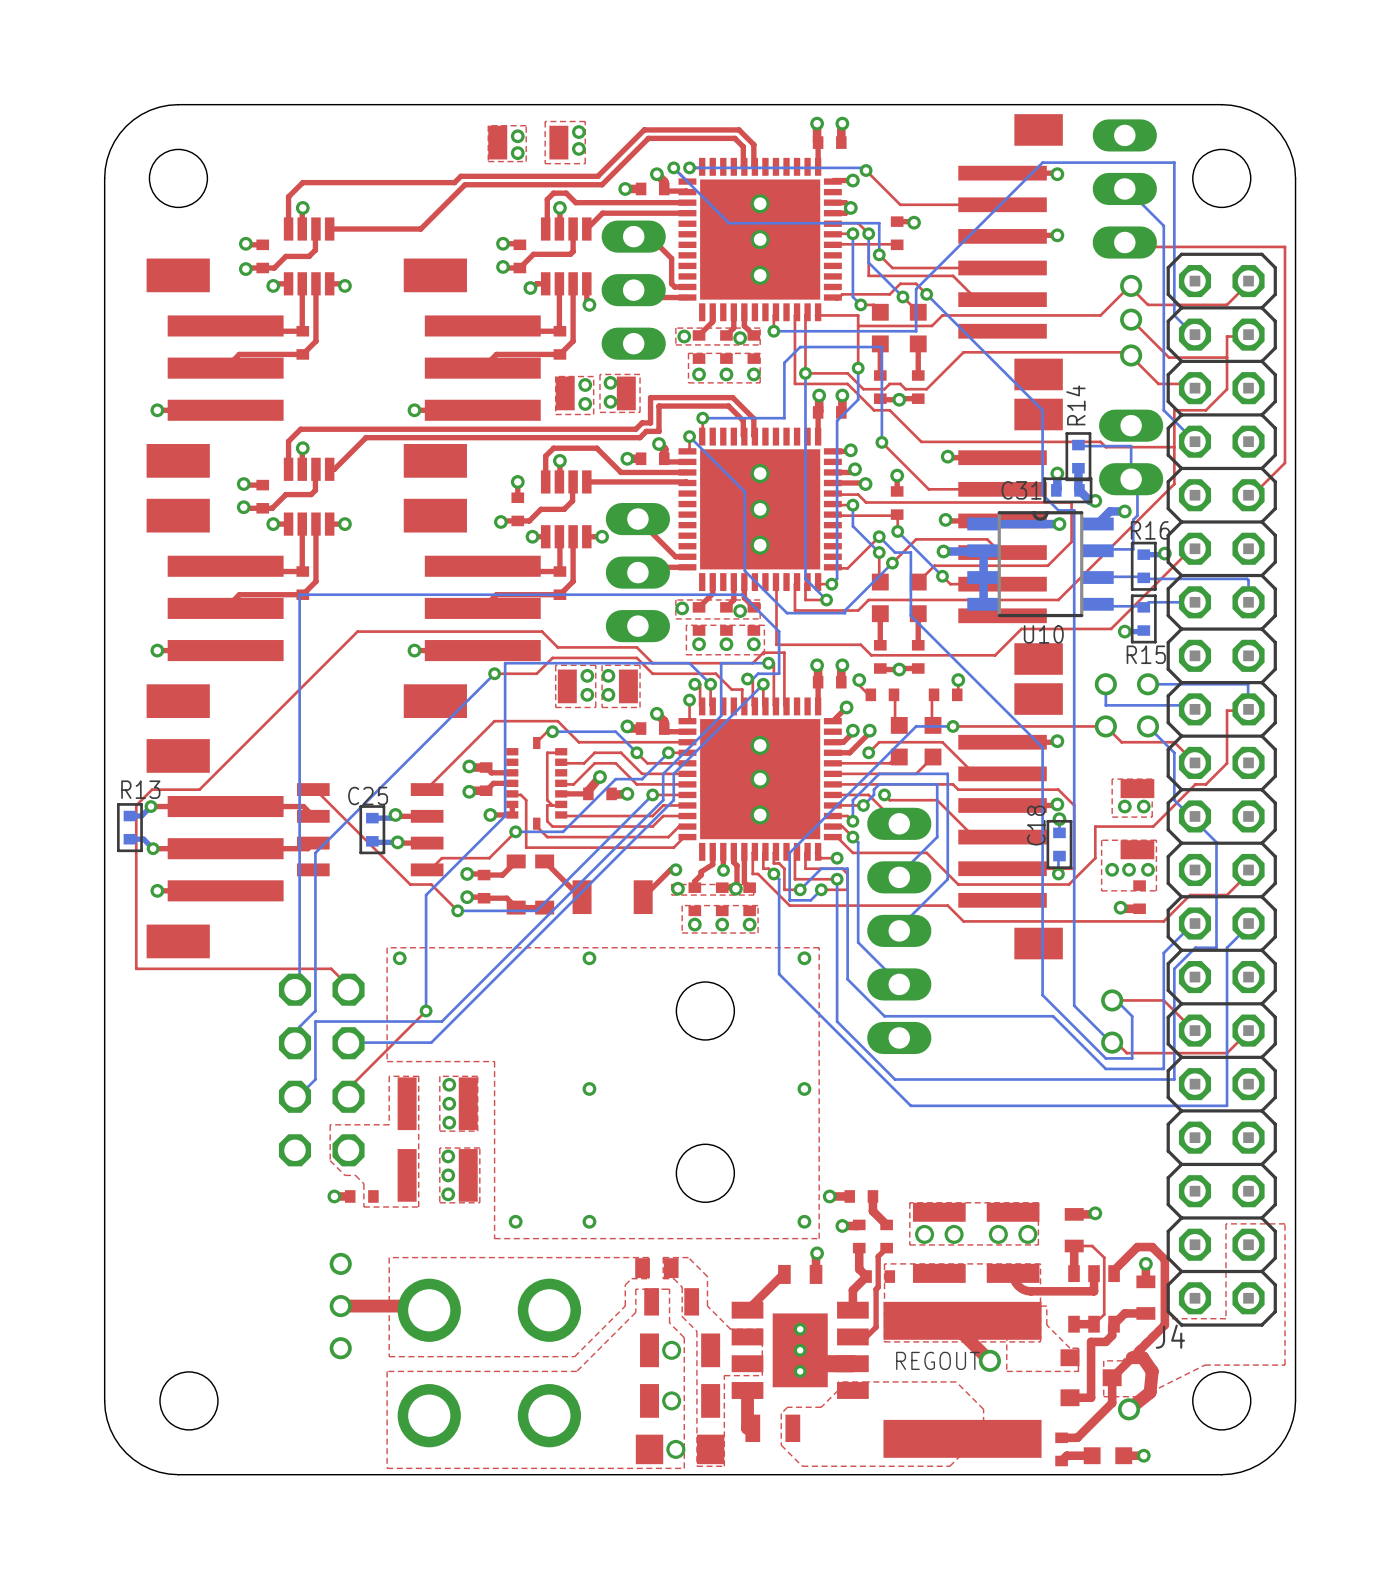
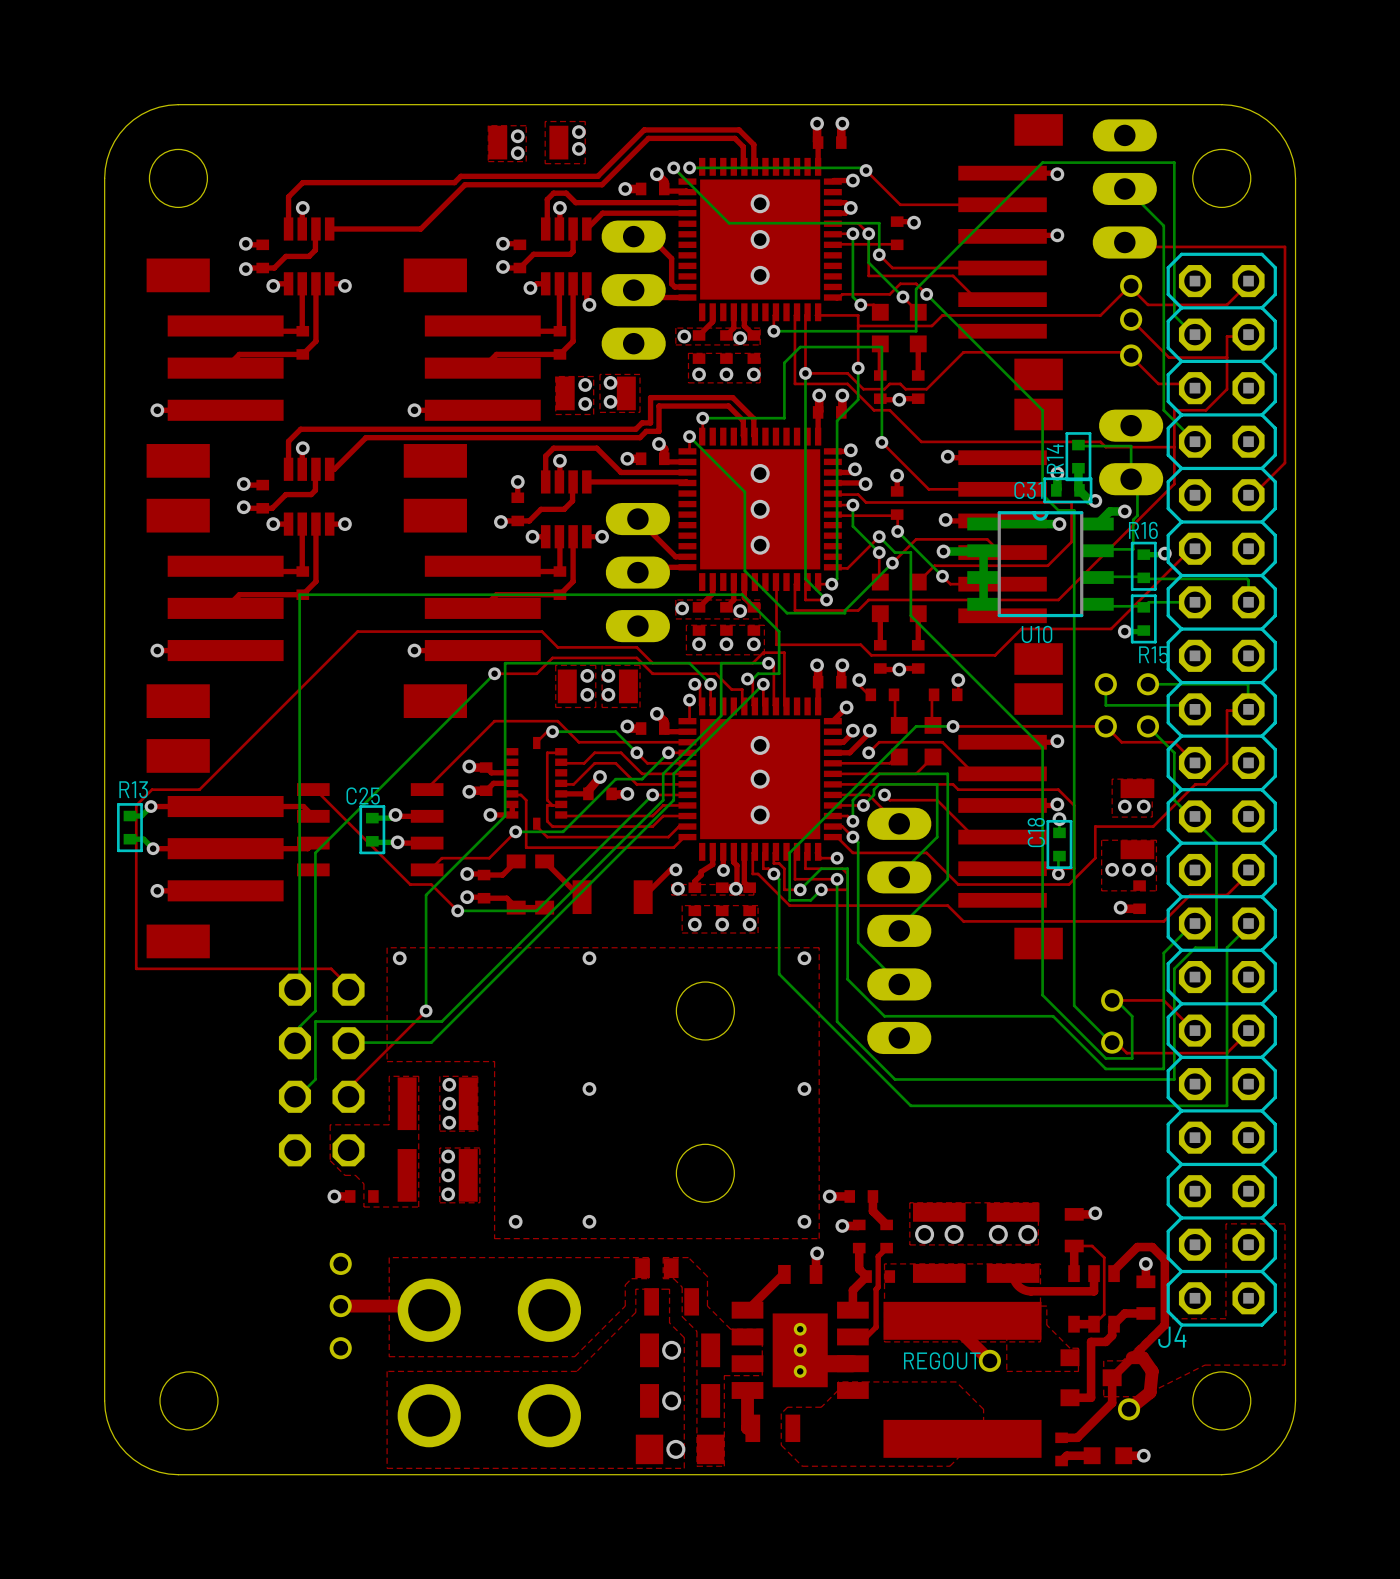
R14 name position: R14 (1075, 405) -> R14 (1055, 458)

